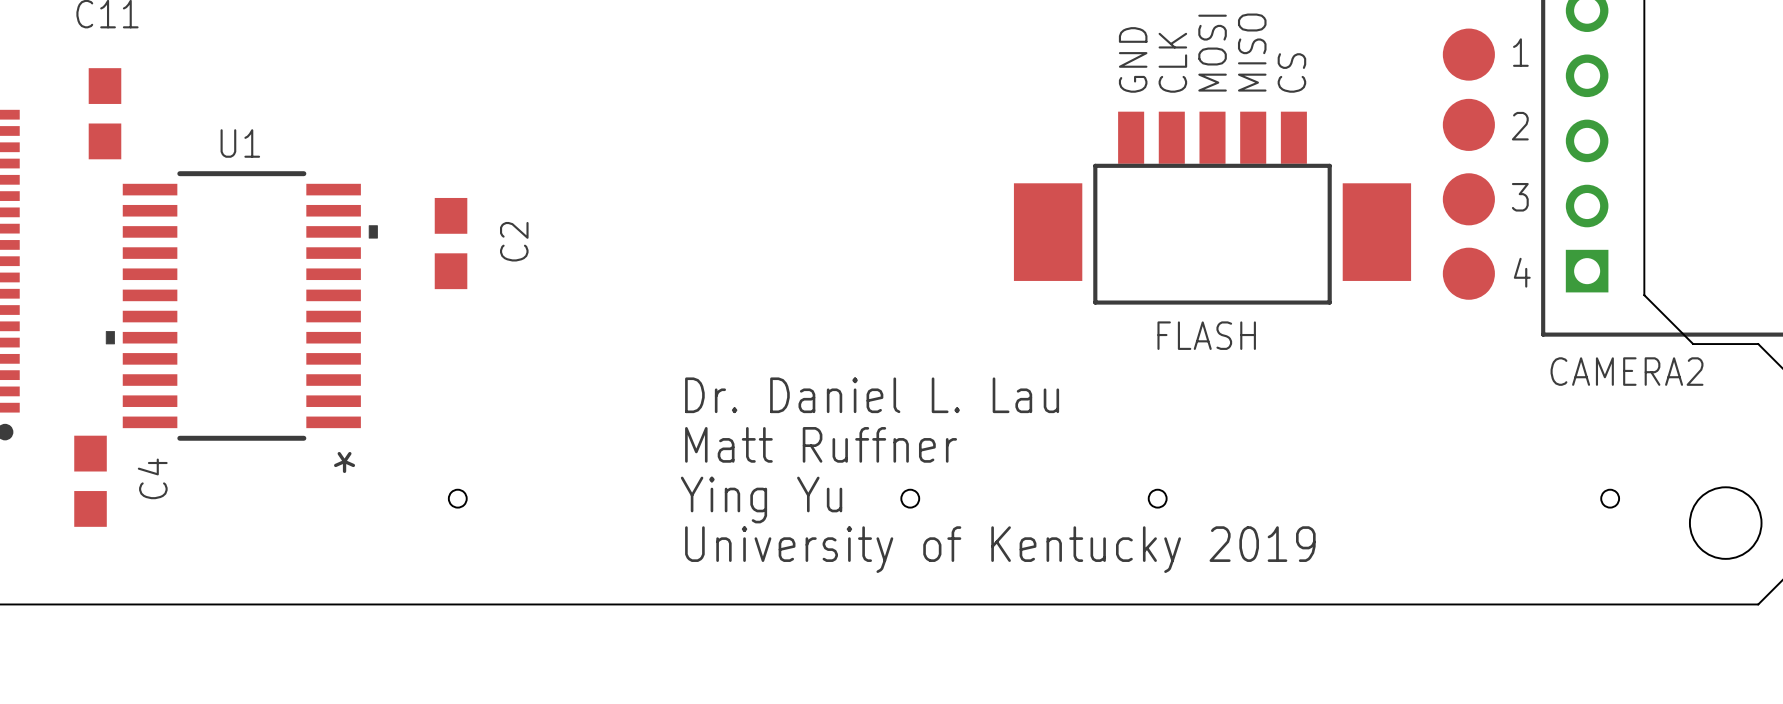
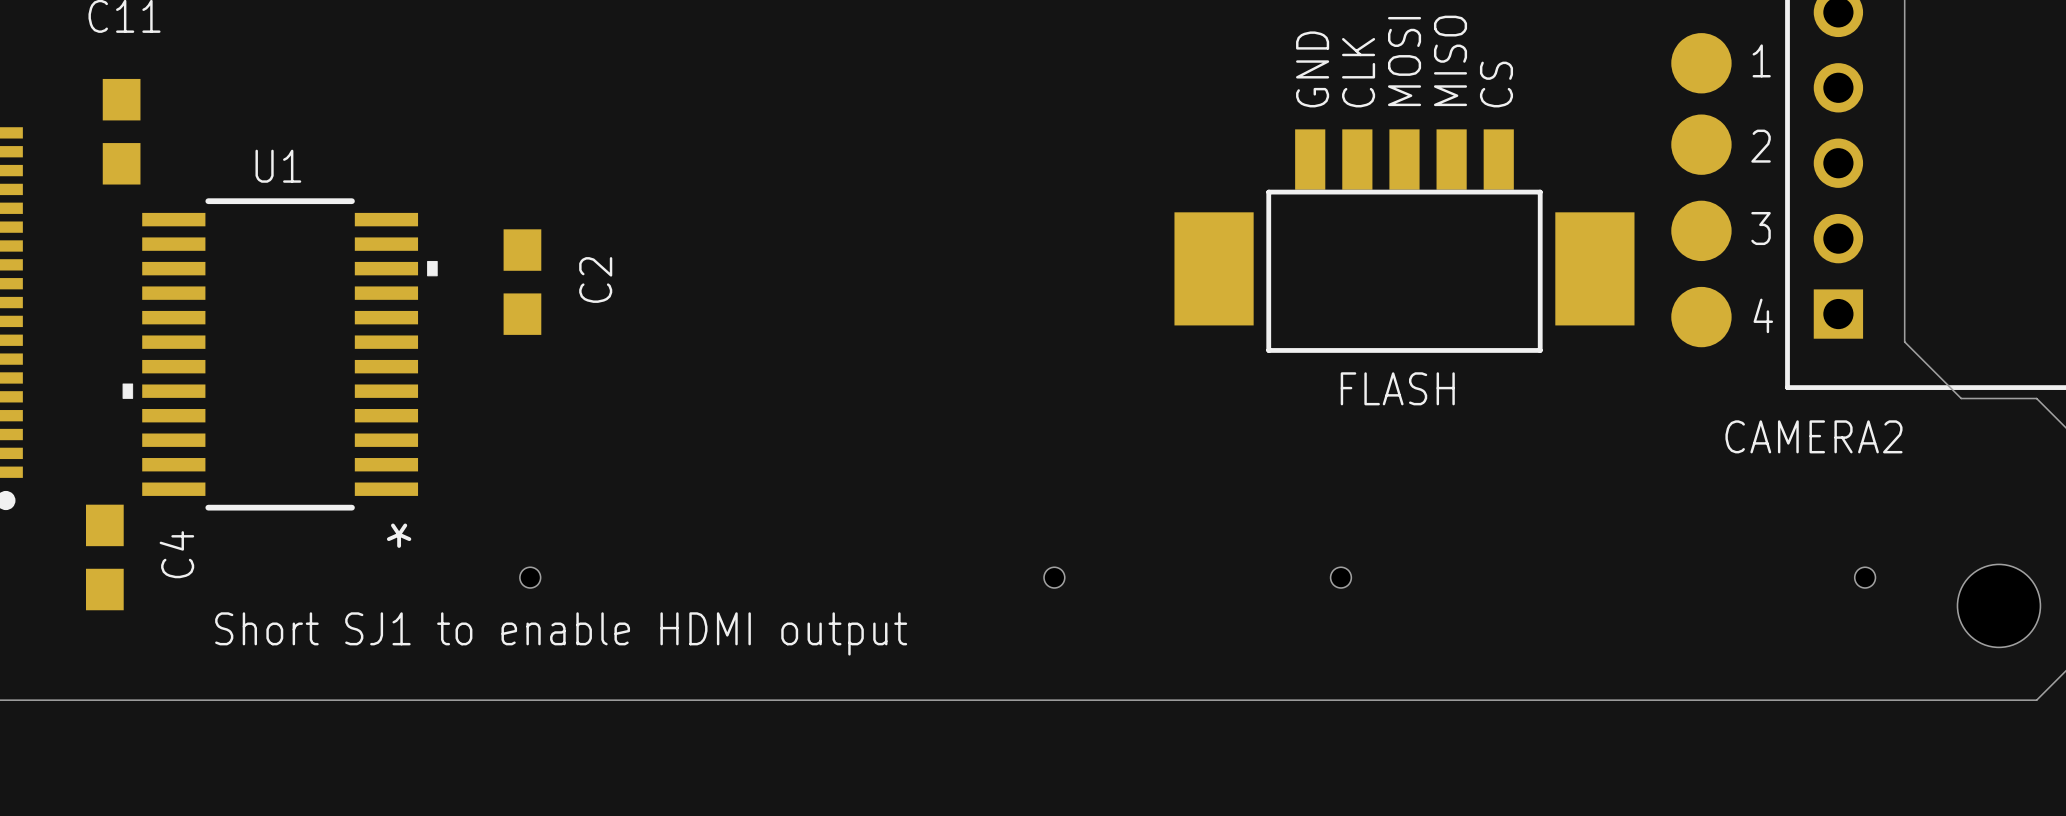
CAMERA2 name position: CAMERA2 (1627, 371) -> CAMERA2 (1813, 436)
text: Dr. Daniel L. Lau (872, 395) -> none
text: Matt Ruffner (821, 444) -> none
text: Ying Yu (761, 500) -> none
text: none -> Short SJ1 to enable HDMI output (561, 633)
text: University of Kentucky 2019 (1000, 549) -> none

